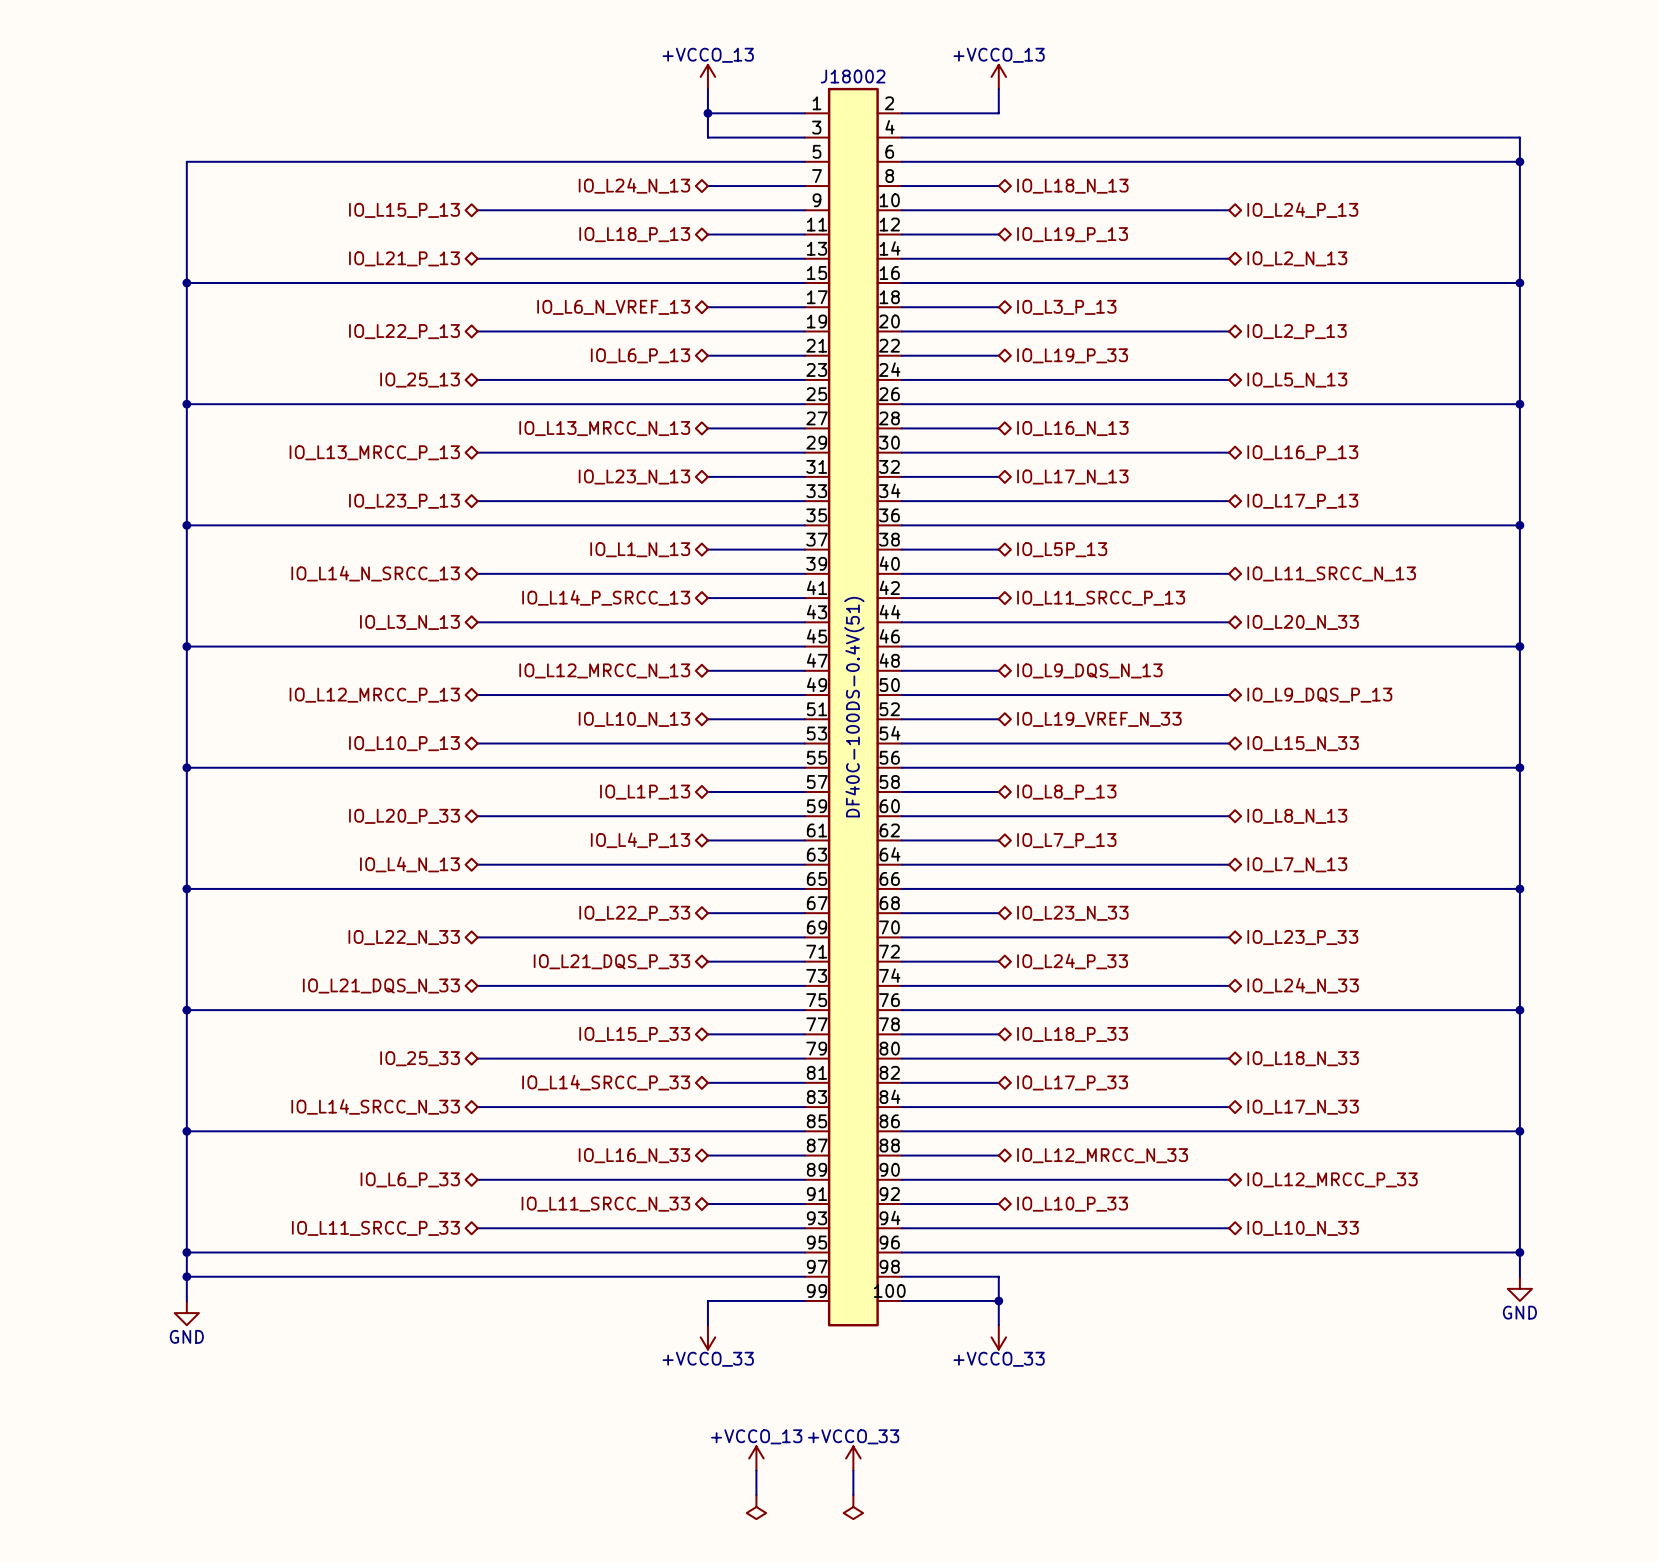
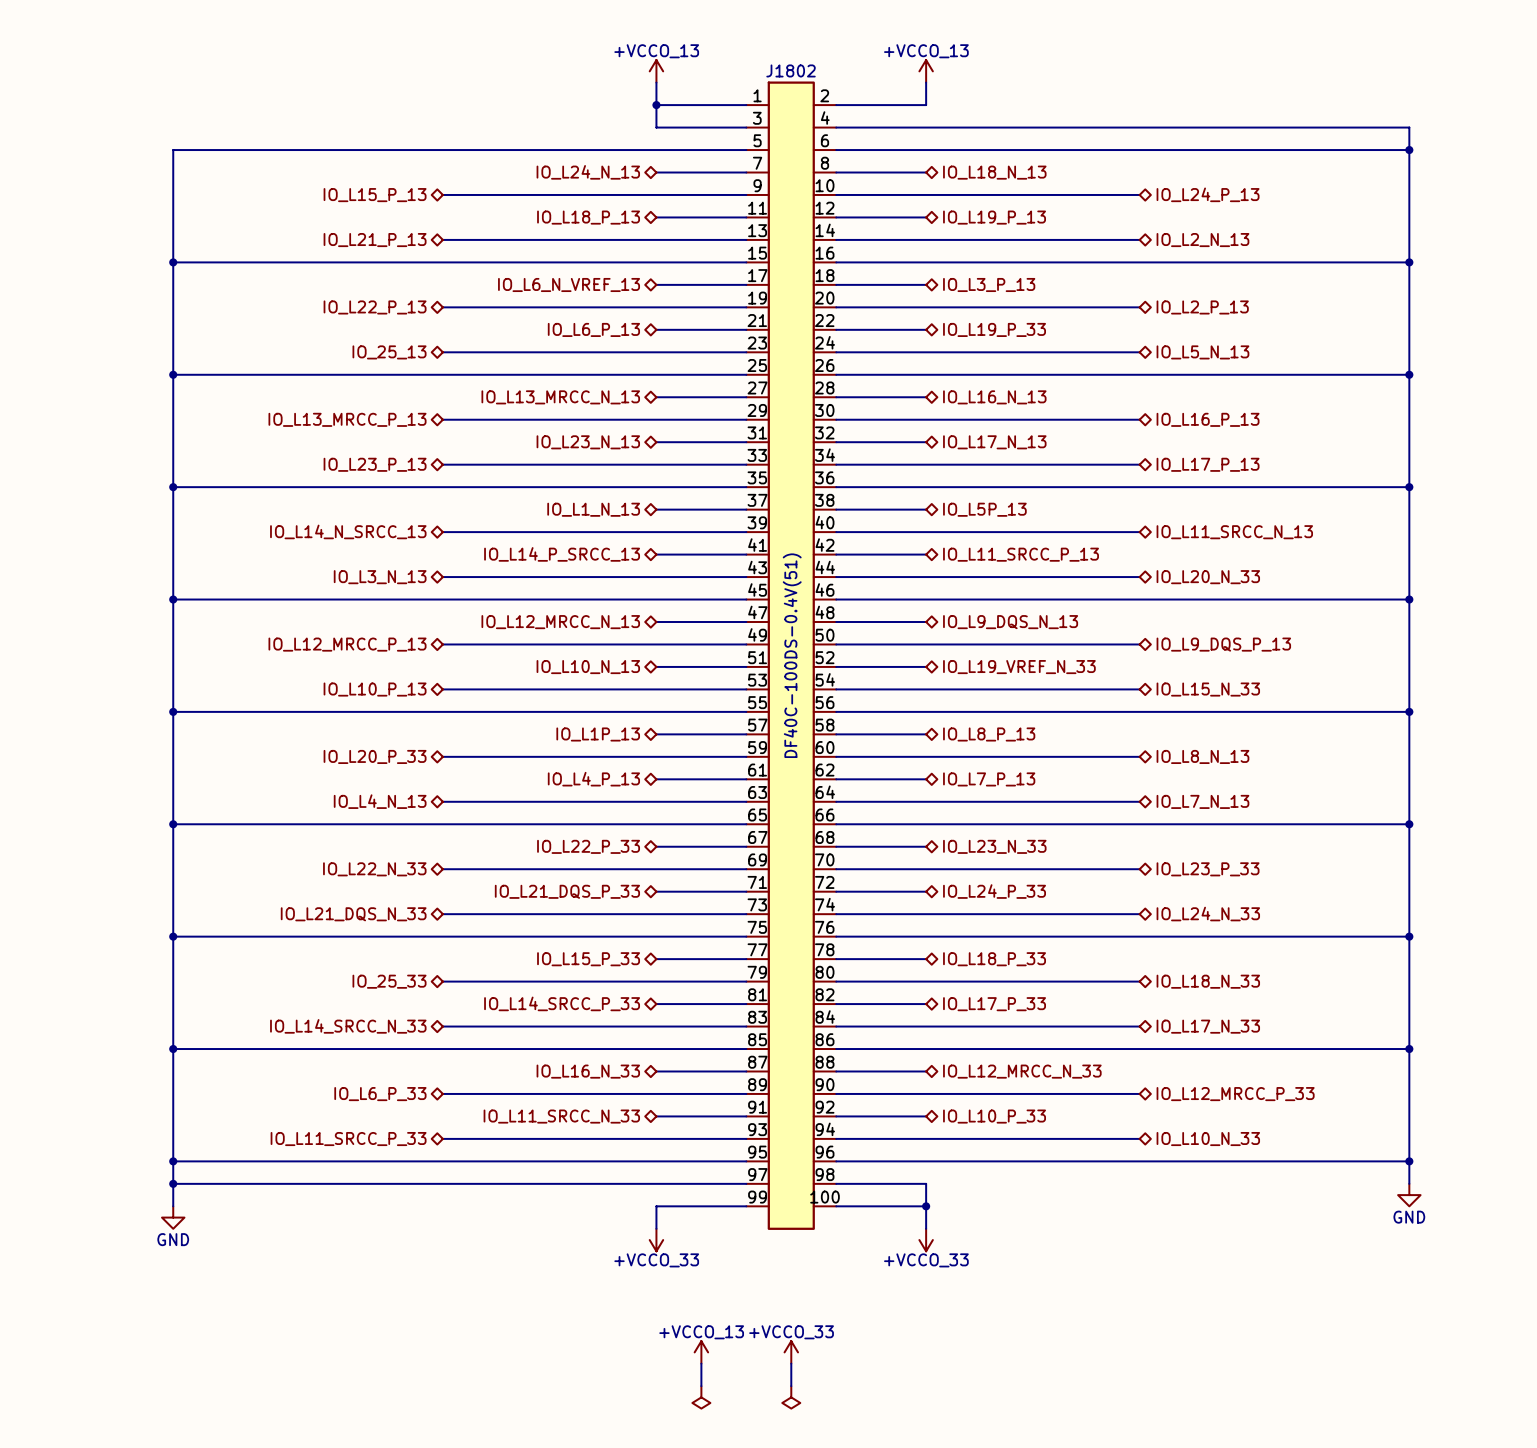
J18002 name: J18002 (853, 76) -> J1802 (791, 70)

